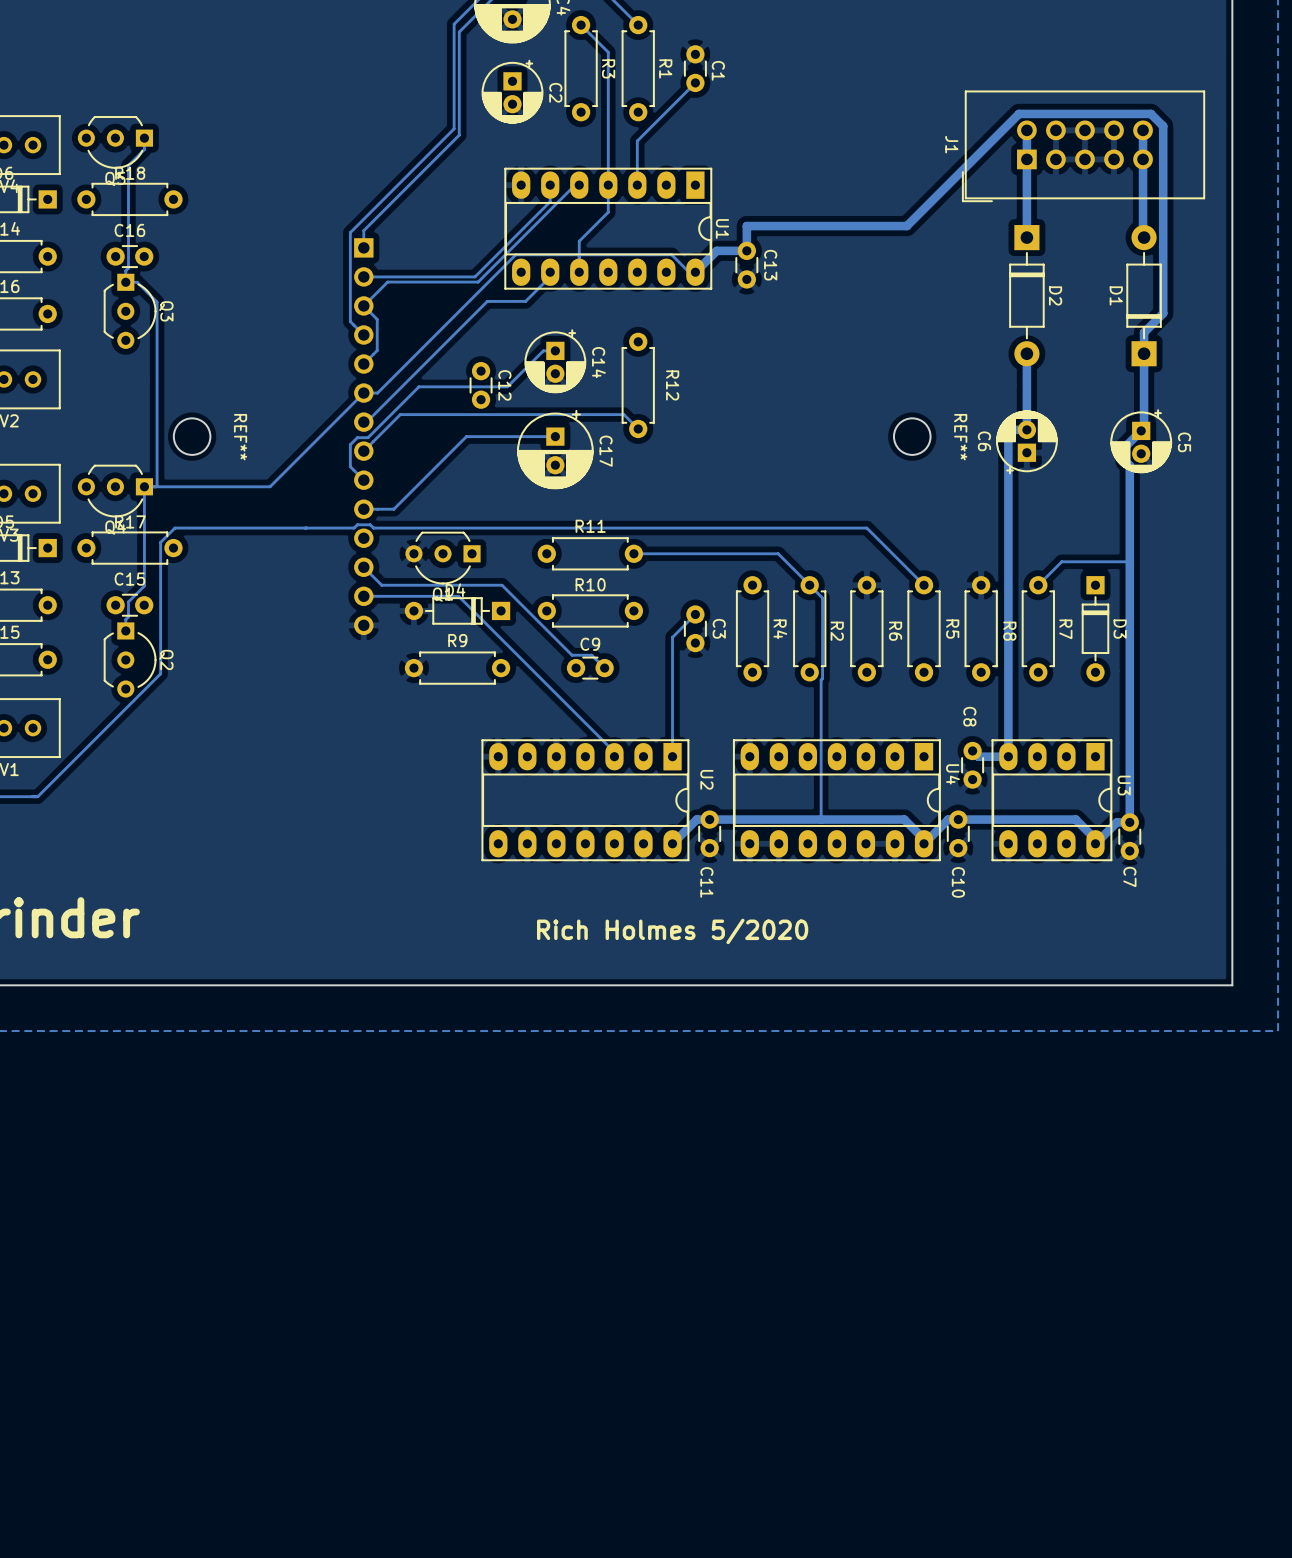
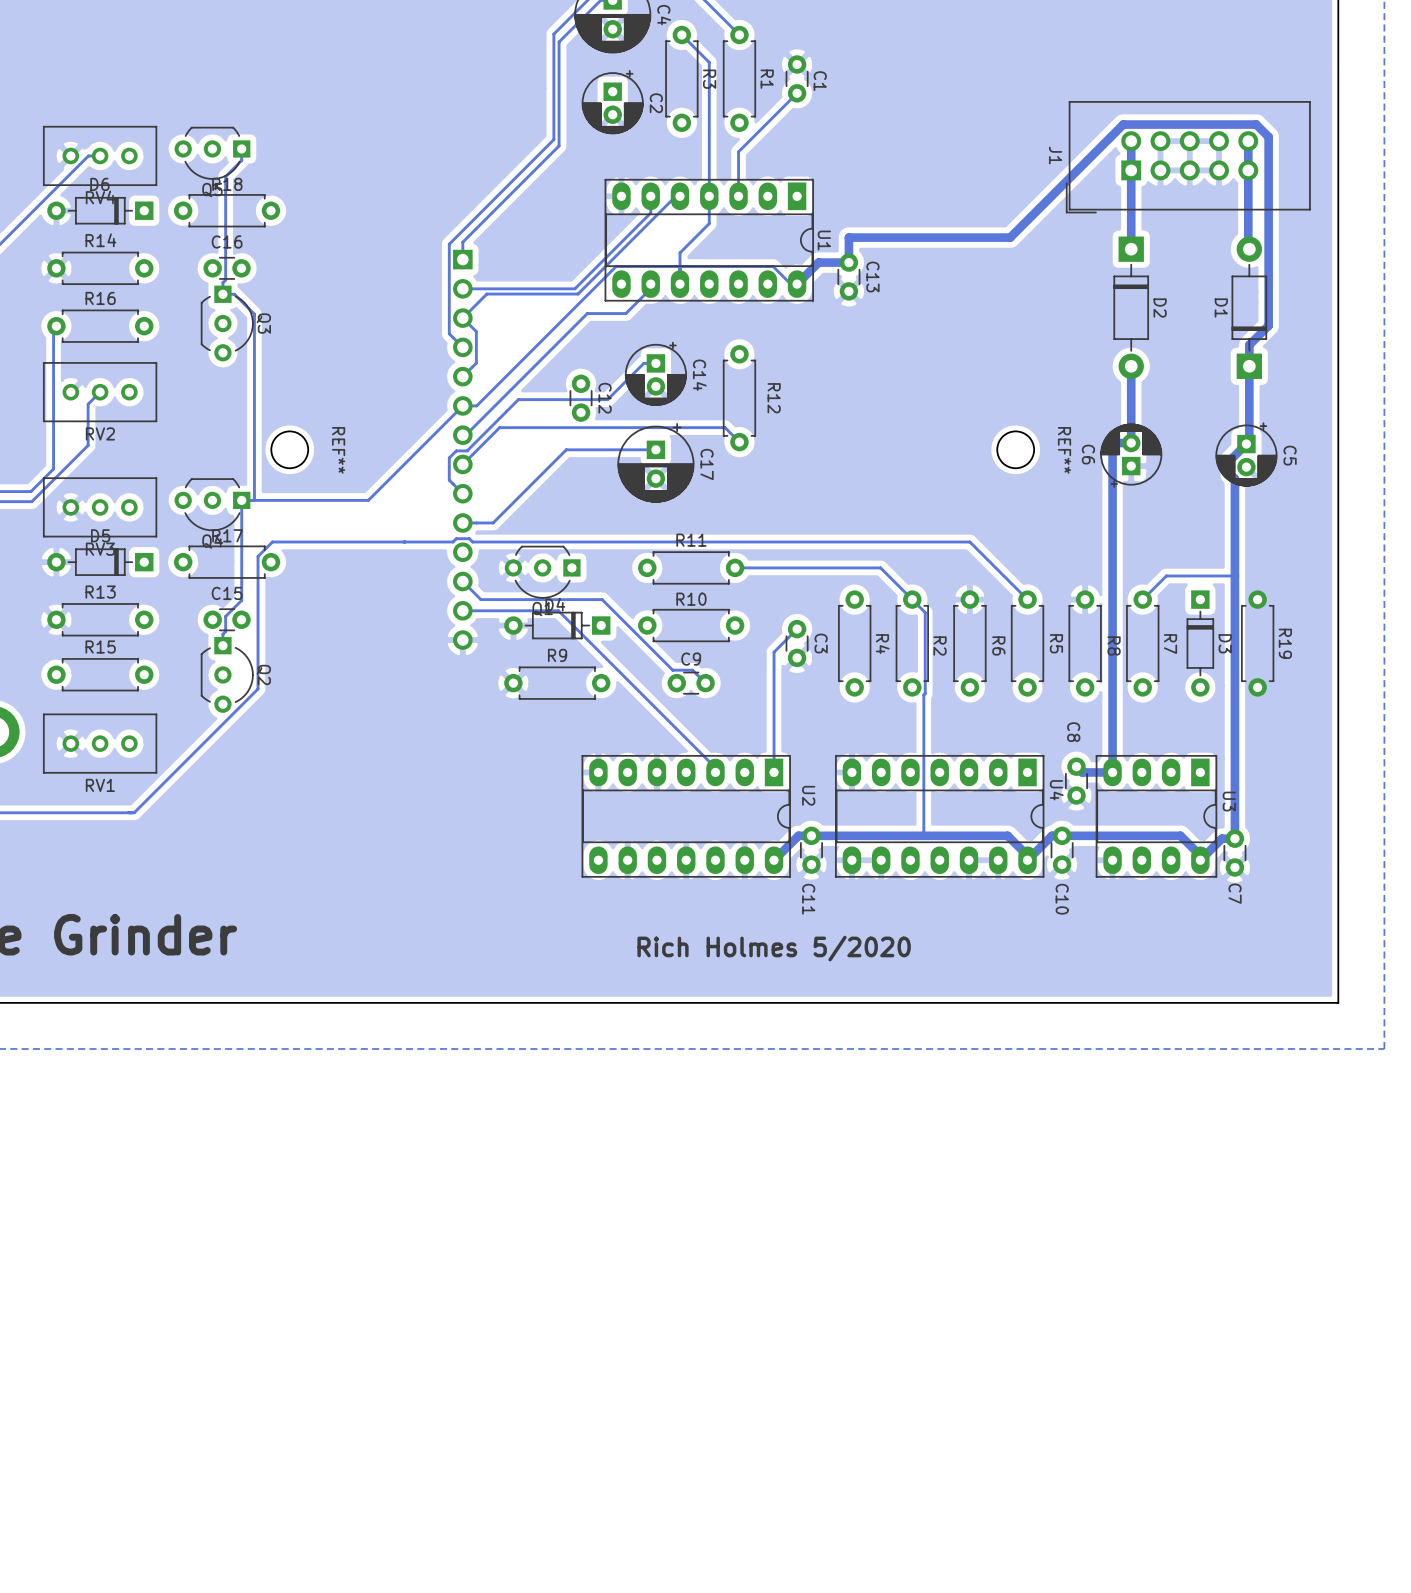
R19: none -> (1257, 643)

